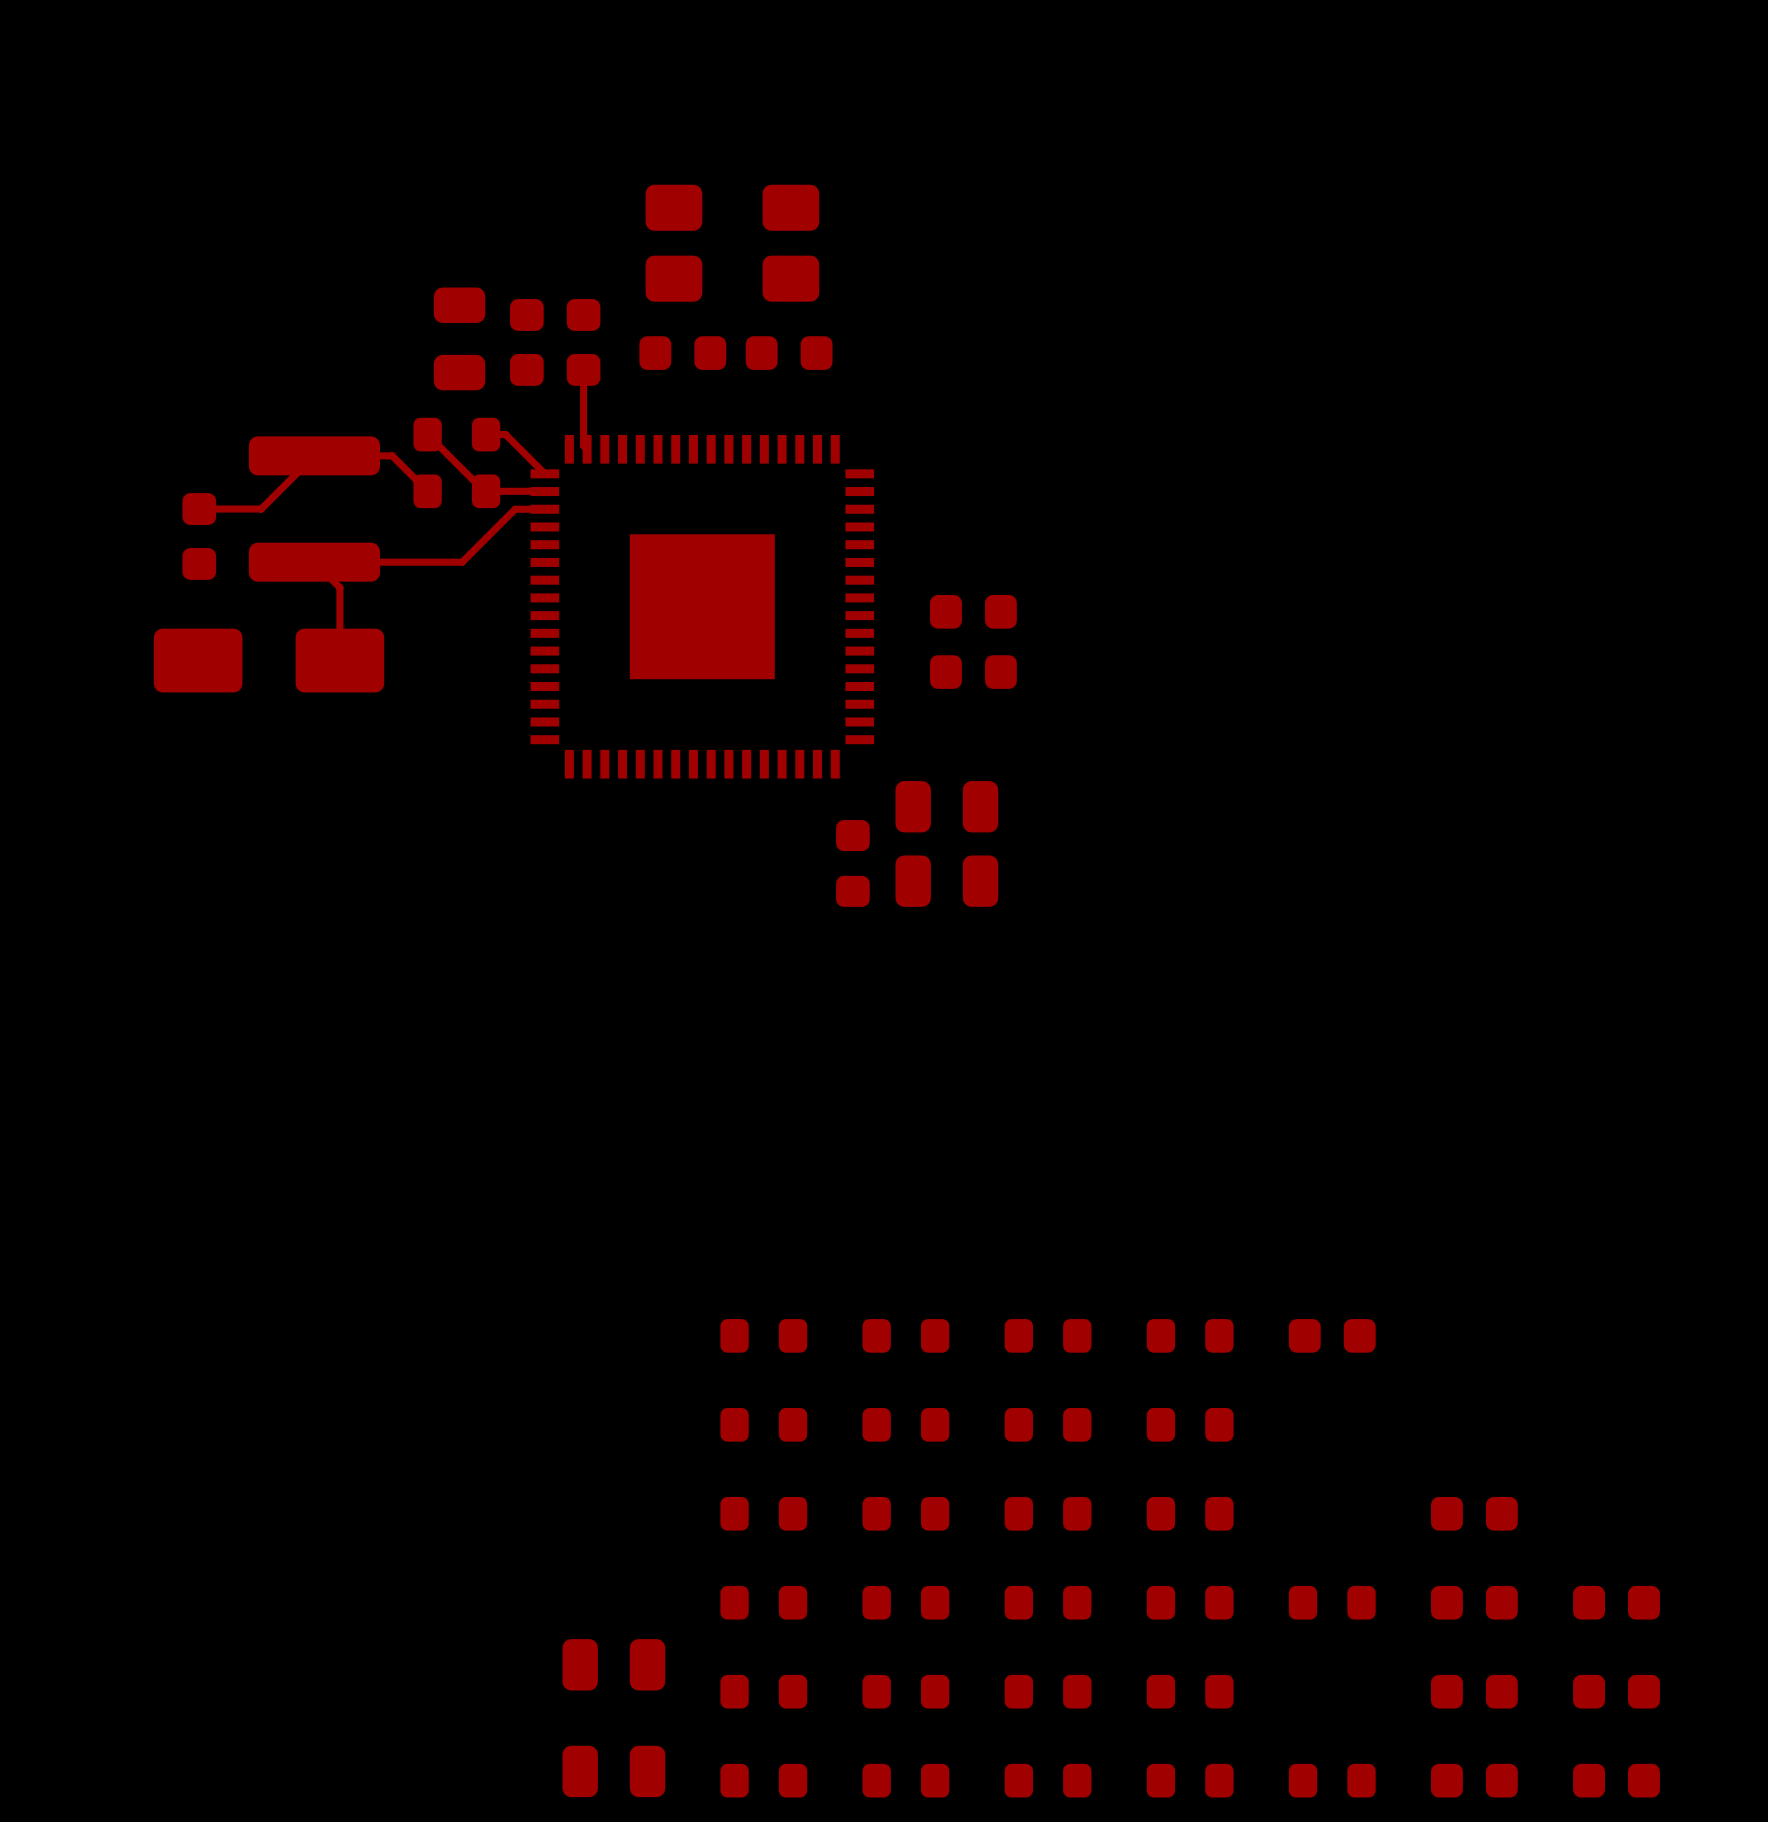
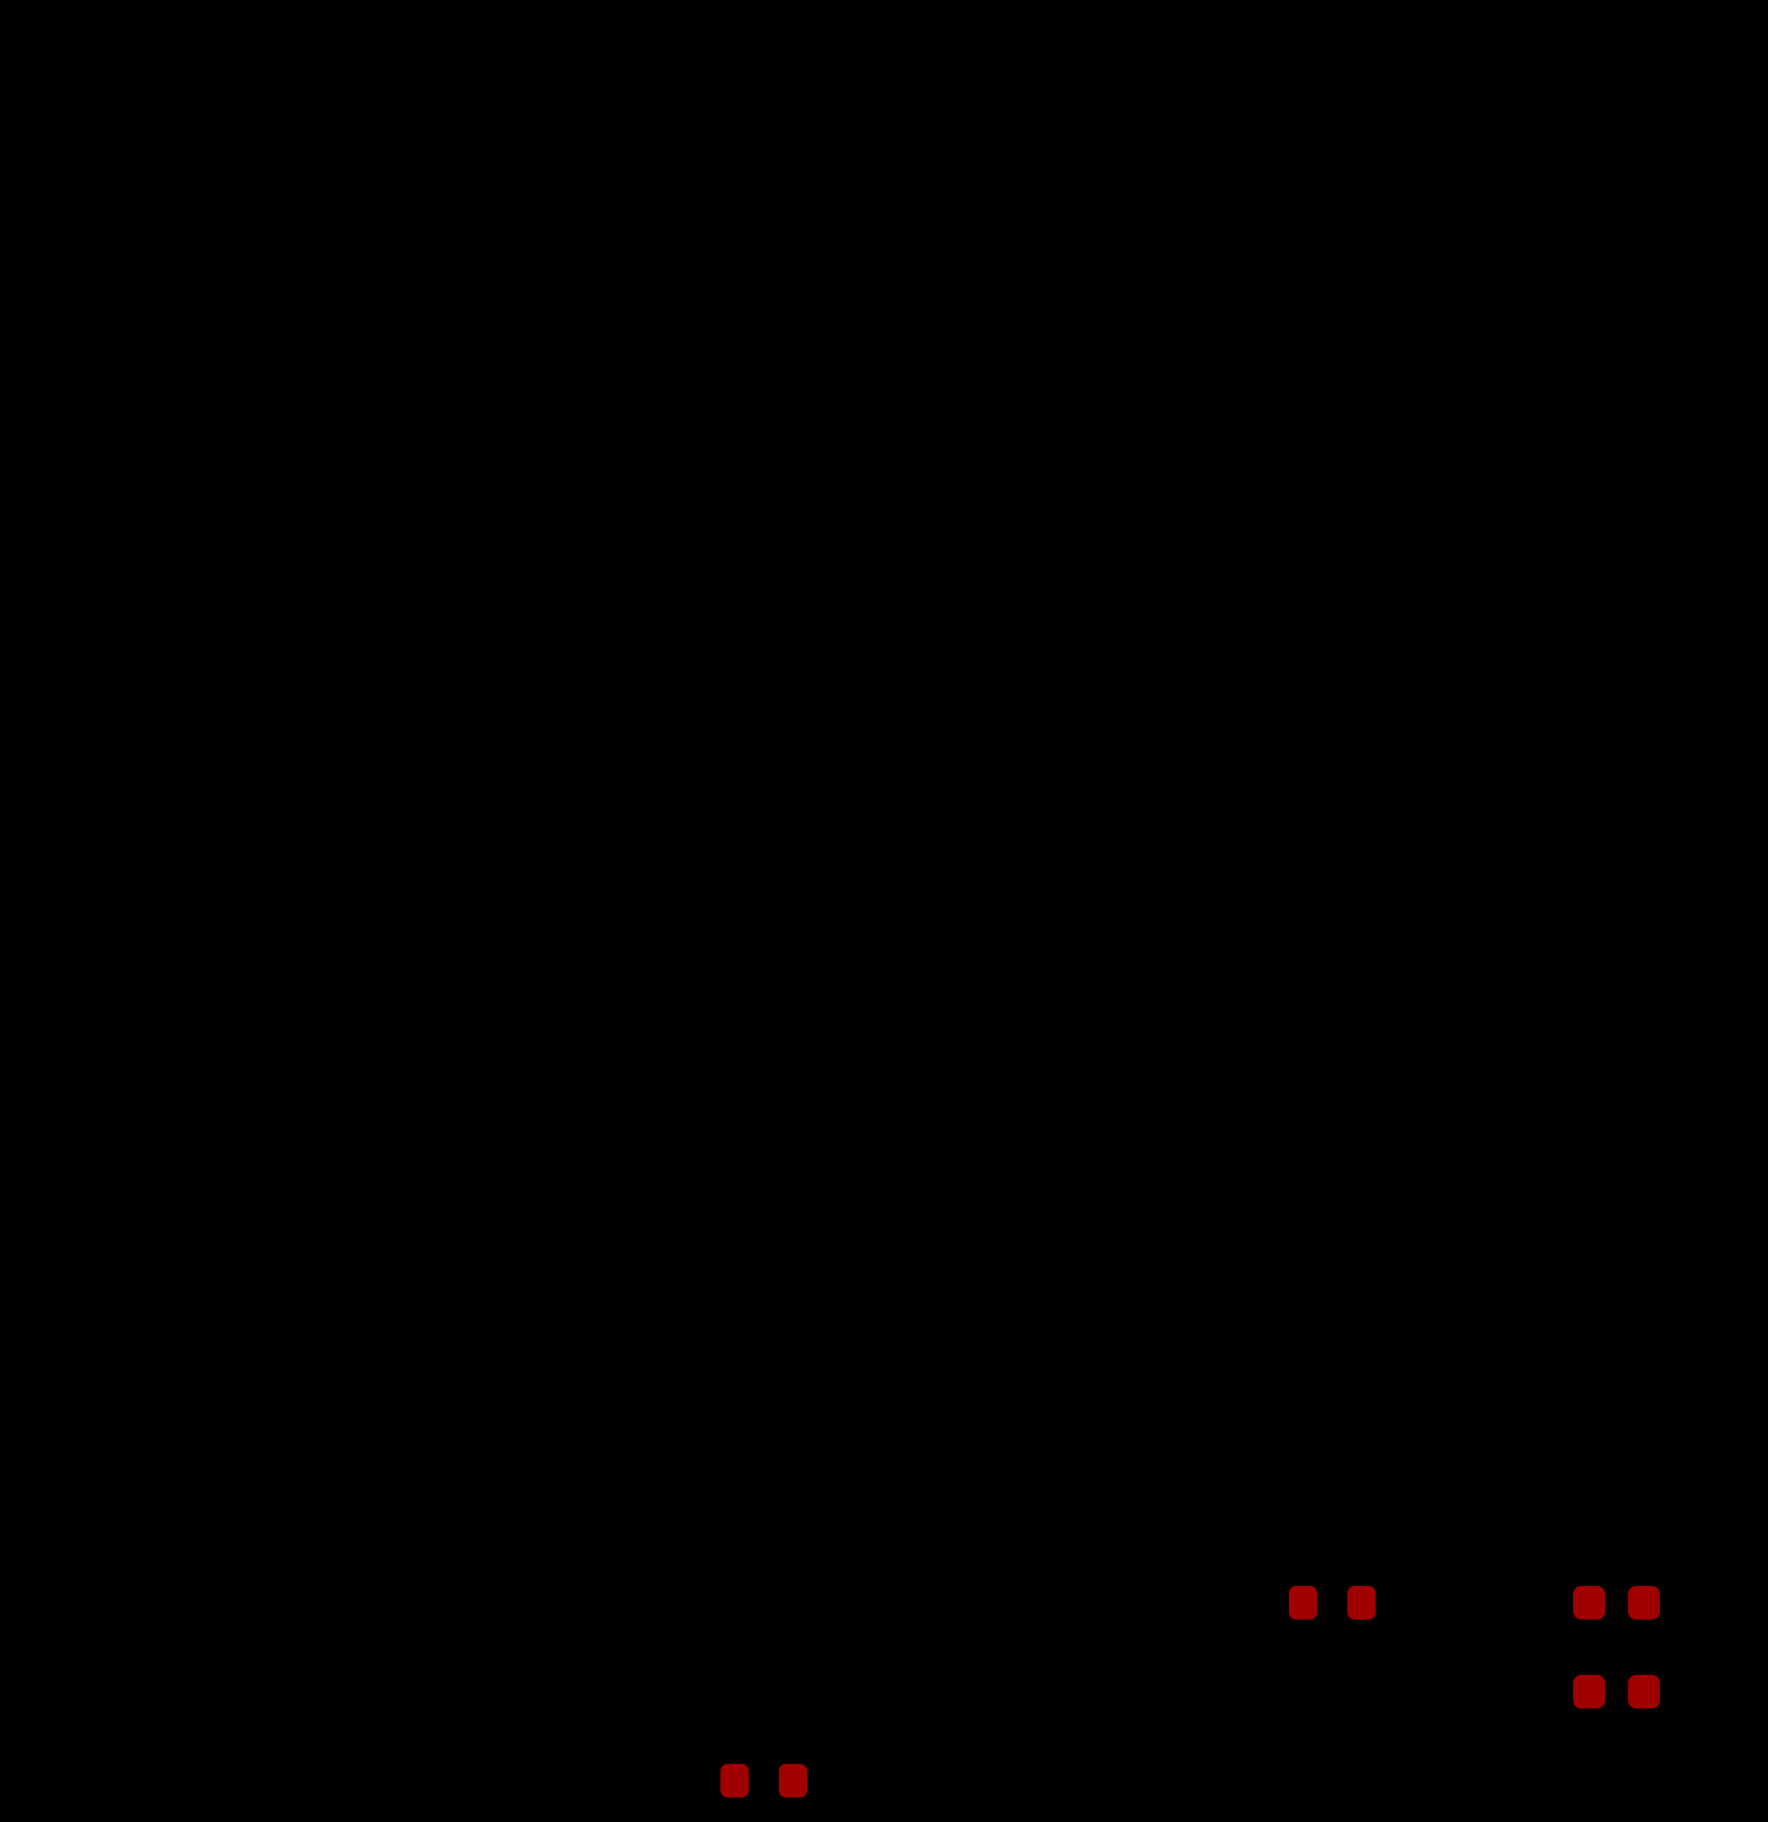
part: (732, 243) -> none
part: (459, 338) -> none
part: (526, 342) -> none
part: (583, 342) -> none
part: (682, 353) -> none
part: (789, 353) -> none
top track: (583, 369) (583, 445) (587, 449) -> none
top track: (427, 434) (484, 491) (544, 491) -> none
part: (456, 434) -> none
top track: (486, 434) (505, 434) (544, 473) -> none
top track: (427, 491) (392, 455) (314, 455) (261, 509) (199, 509) -> none
part: (456, 491) -> none
part: (314, 509) -> none
top track: (544, 509) (515, 509) (462, 562) (314, 562) (339, 587) (339, 660) -> none
part: (199, 536) -> none
part: (702, 606) -> none
part: (973, 611) -> none
part: (269, 660) -> none
part: (973, 672) -> none
part: (946, 806) -> none
part: (852, 863) -> none
part: (946, 881) -> none
part: (763, 1335) -> none
part: (905, 1335) -> none
part: (1048, 1335) -> none
part: (1190, 1335) -> none
part: (1332, 1335) -> none
part: (763, 1424) -> none
part: (905, 1424) -> none
part: (1048, 1424) -> none
part: (1190, 1424) -> none
part: (763, 1513) -> none
part: (905, 1513) -> none
part: (1048, 1513) -> none
part: (1190, 1513) -> none
part: (1474, 1513) -> none
part: (763, 1602) -> none
part: (905, 1602) -> none
part: (1048, 1602) -> none
part: (1190, 1602) -> none
part: (1474, 1602) -> none
part: (613, 1664) -> none
part: (763, 1691) -> none
part: (905, 1691) -> none
part: (1048, 1691) -> none
part: (1190, 1691) -> none
part: (1474, 1691) -> none
part: (613, 1771) -> none
part: (905, 1780) -> none
part: (1048, 1780) -> none
part: (1190, 1780) -> none
part: (1332, 1780) -> none
part: (1474, 1780) -> none
part: (1616, 1780) -> none

